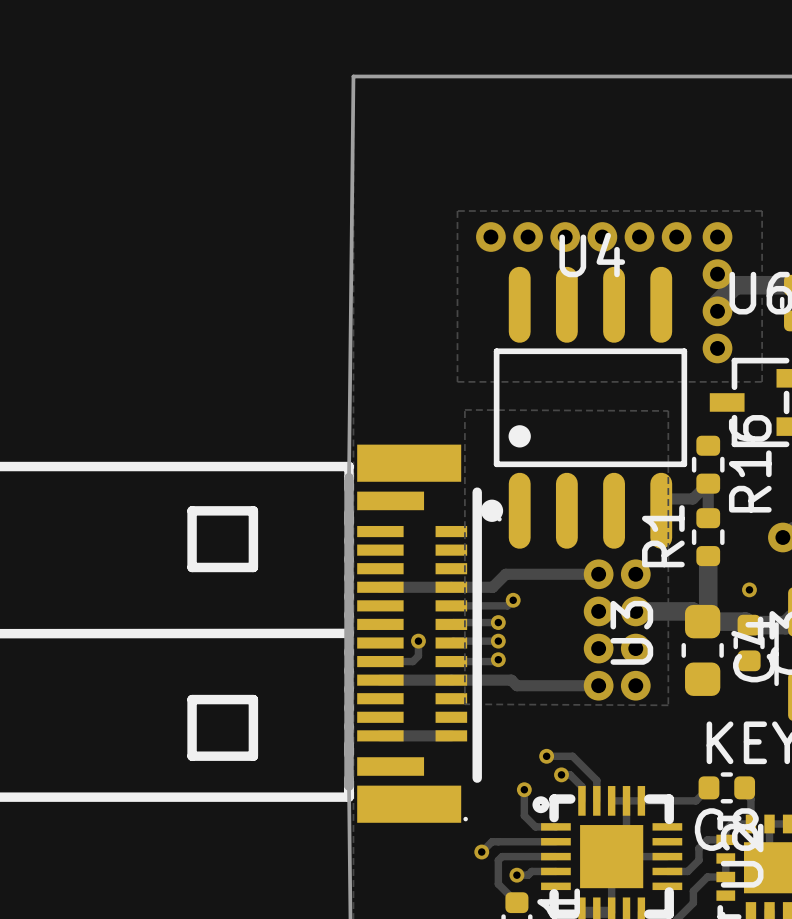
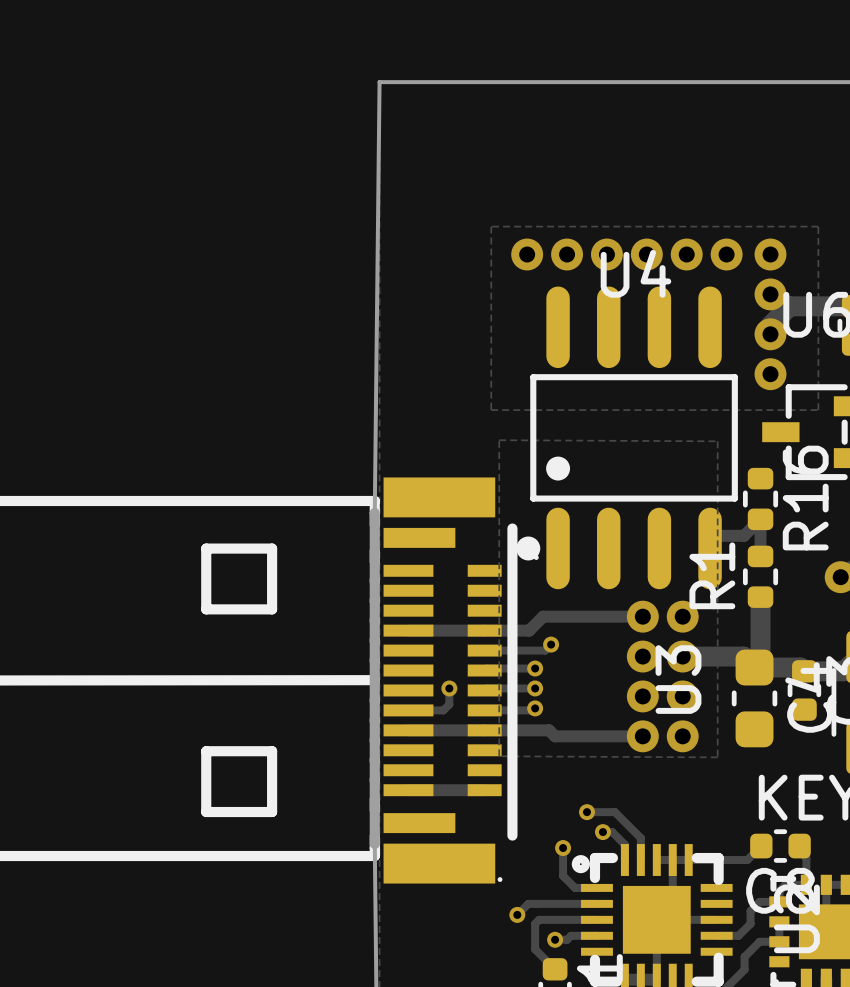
via: (749, 589) -> none

